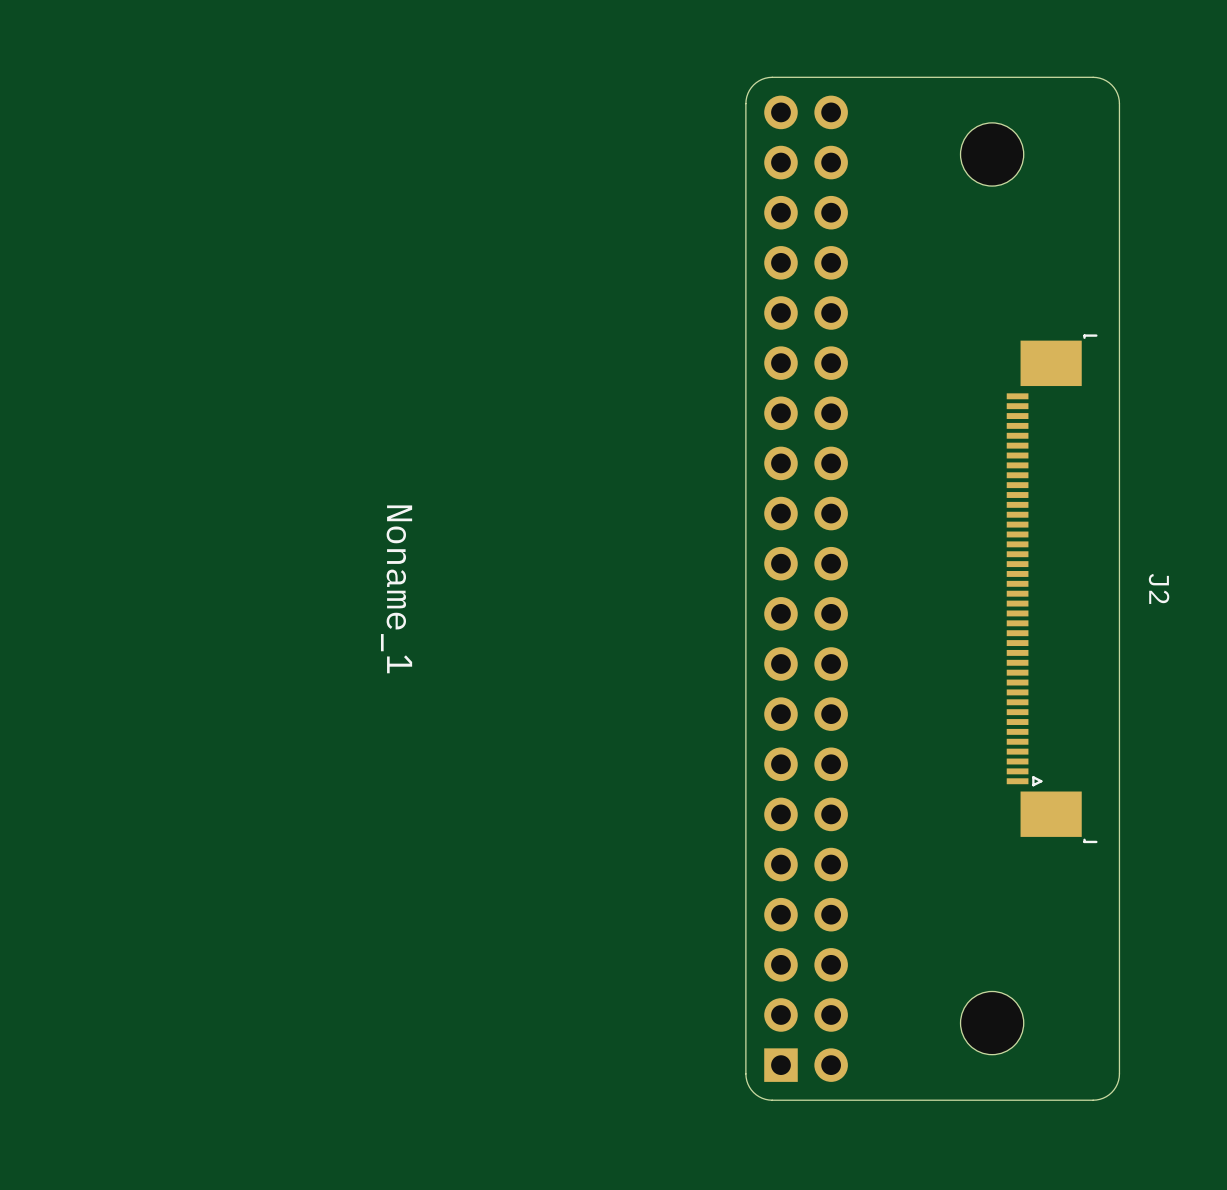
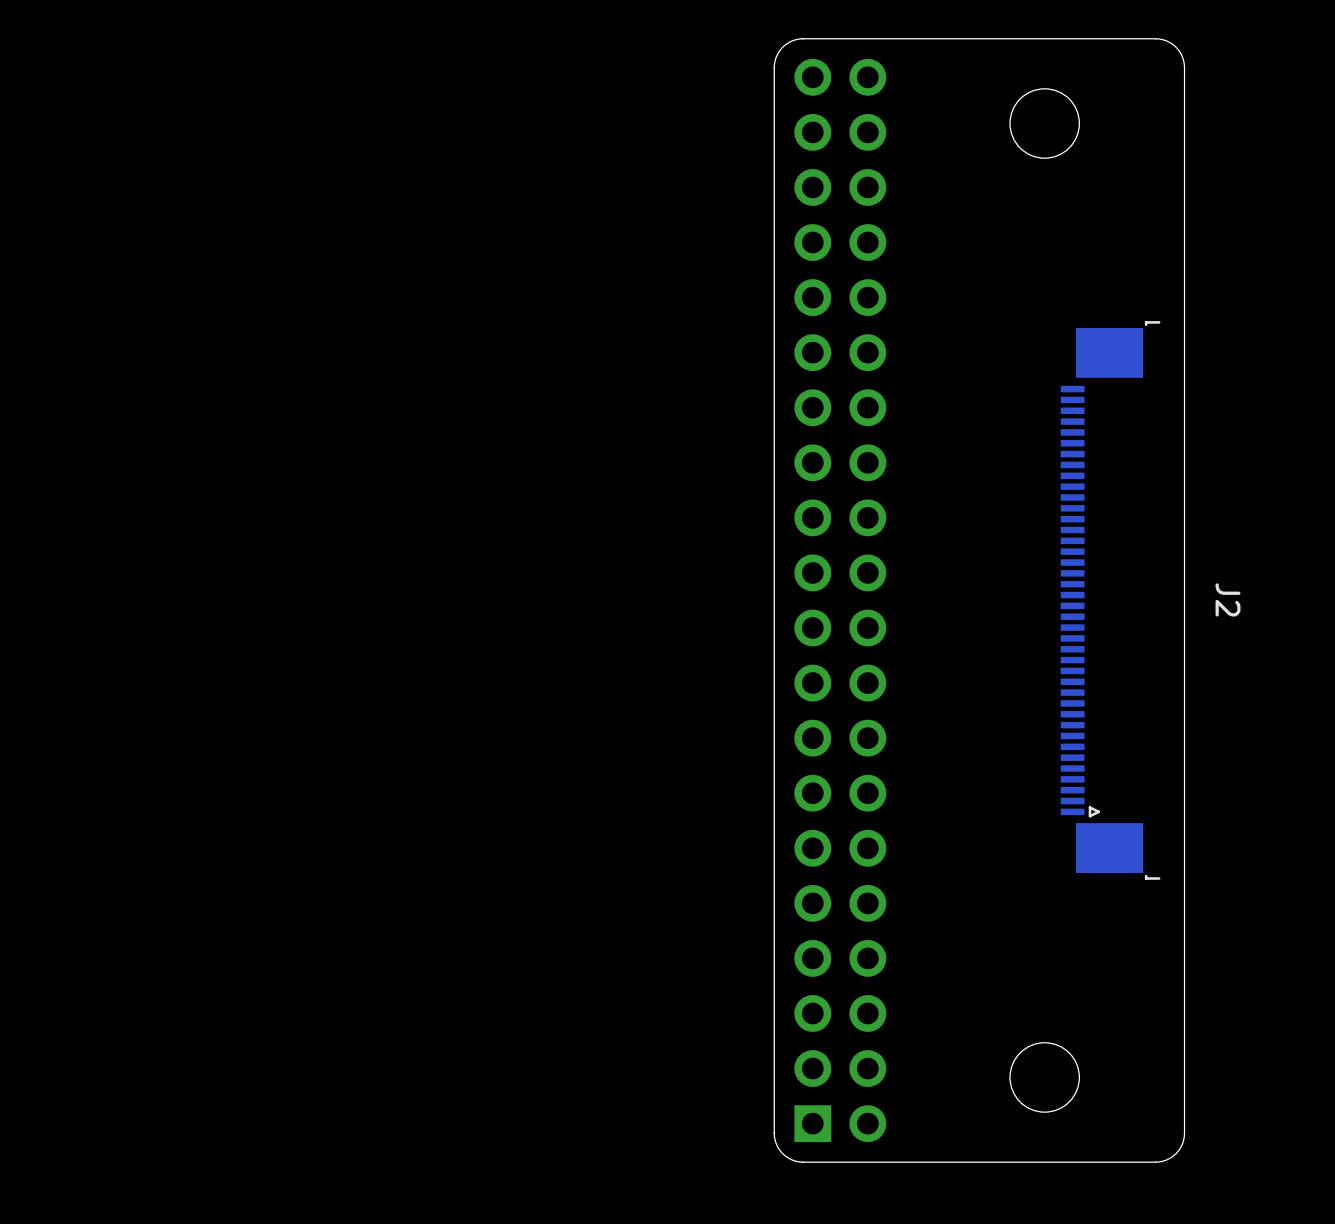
Noname_1: (396, 589) -> none

